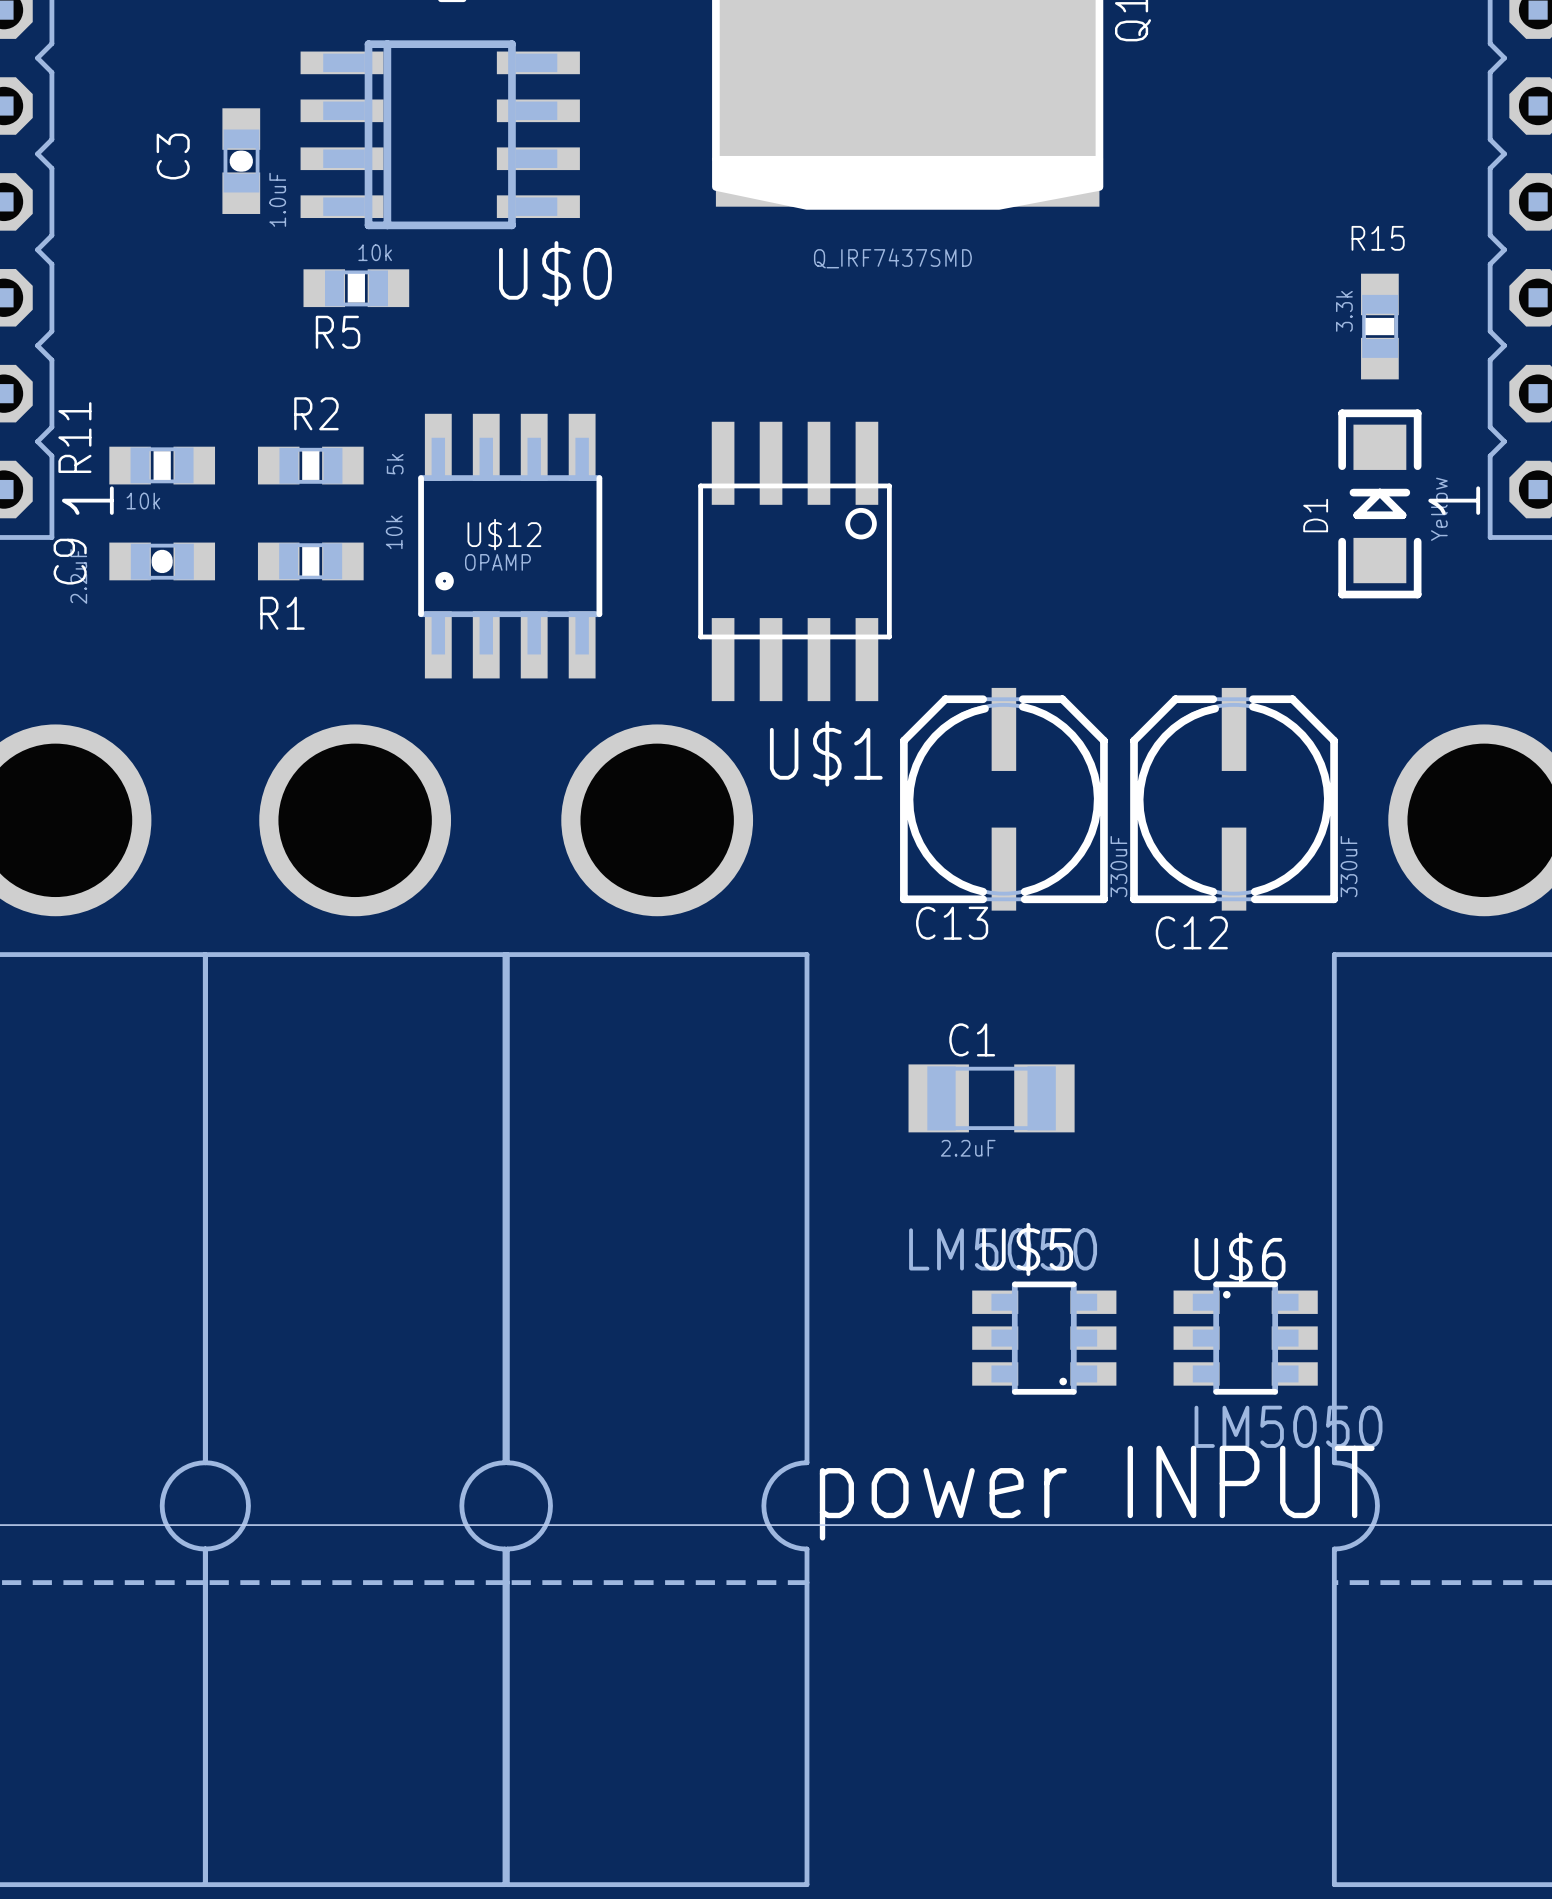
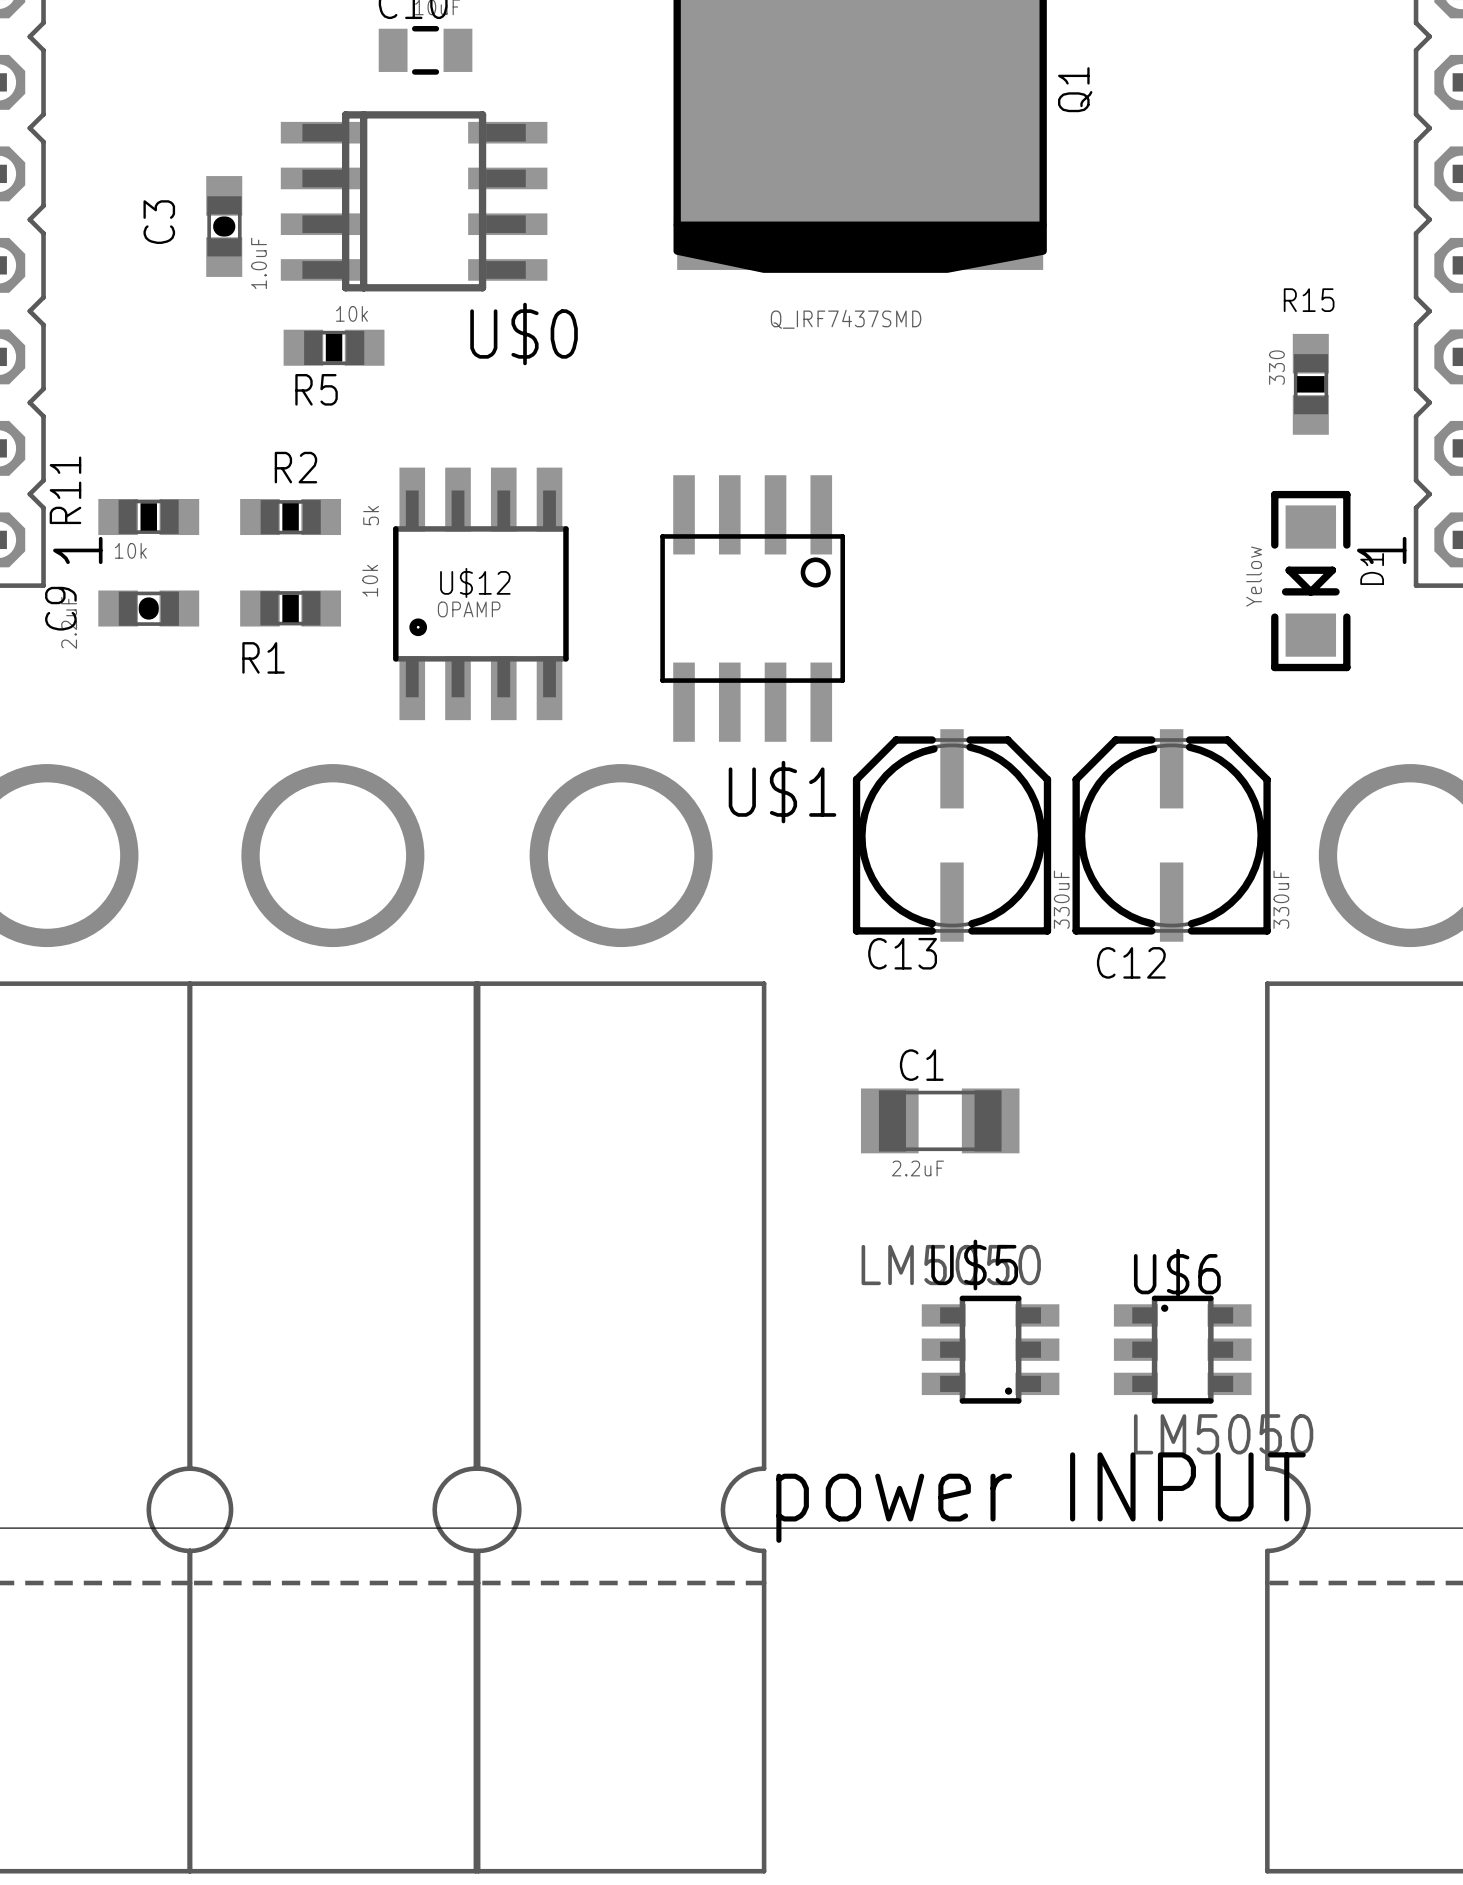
R15 value: 3.3k (1344, 311) -> 330 (1276, 367)
D1 rotation: 0° (1379, 503) -> 180° (1310, 581)

